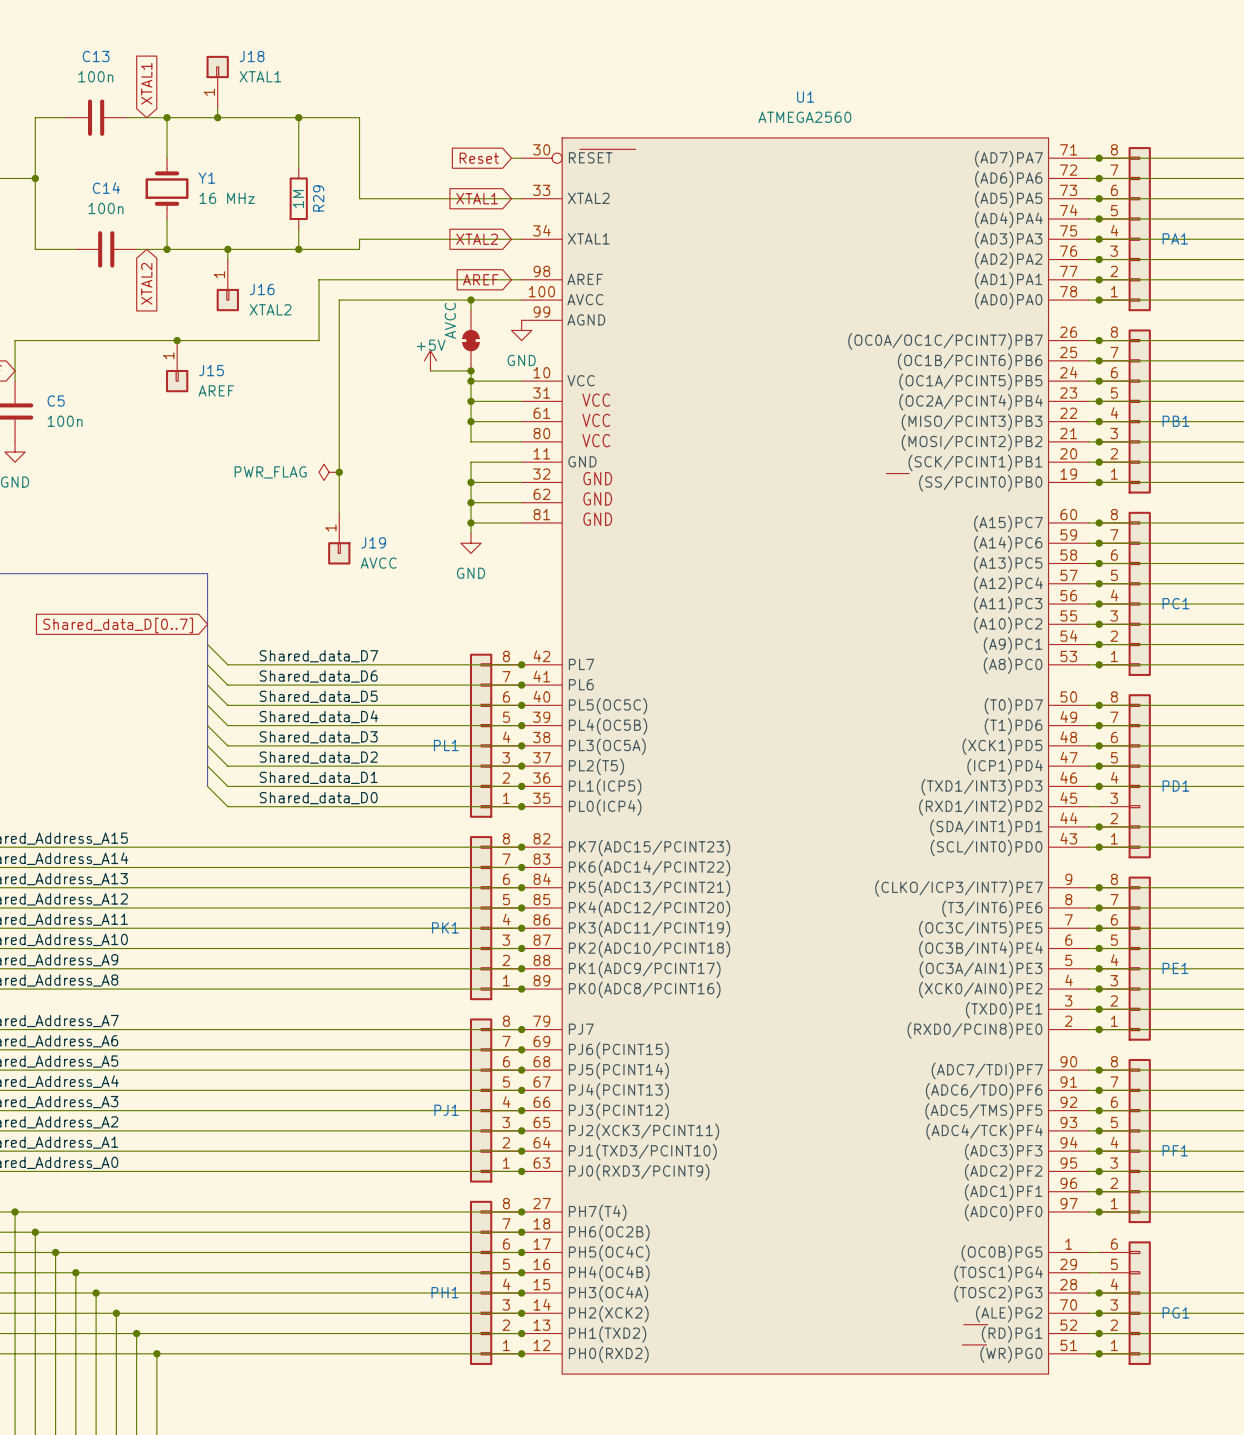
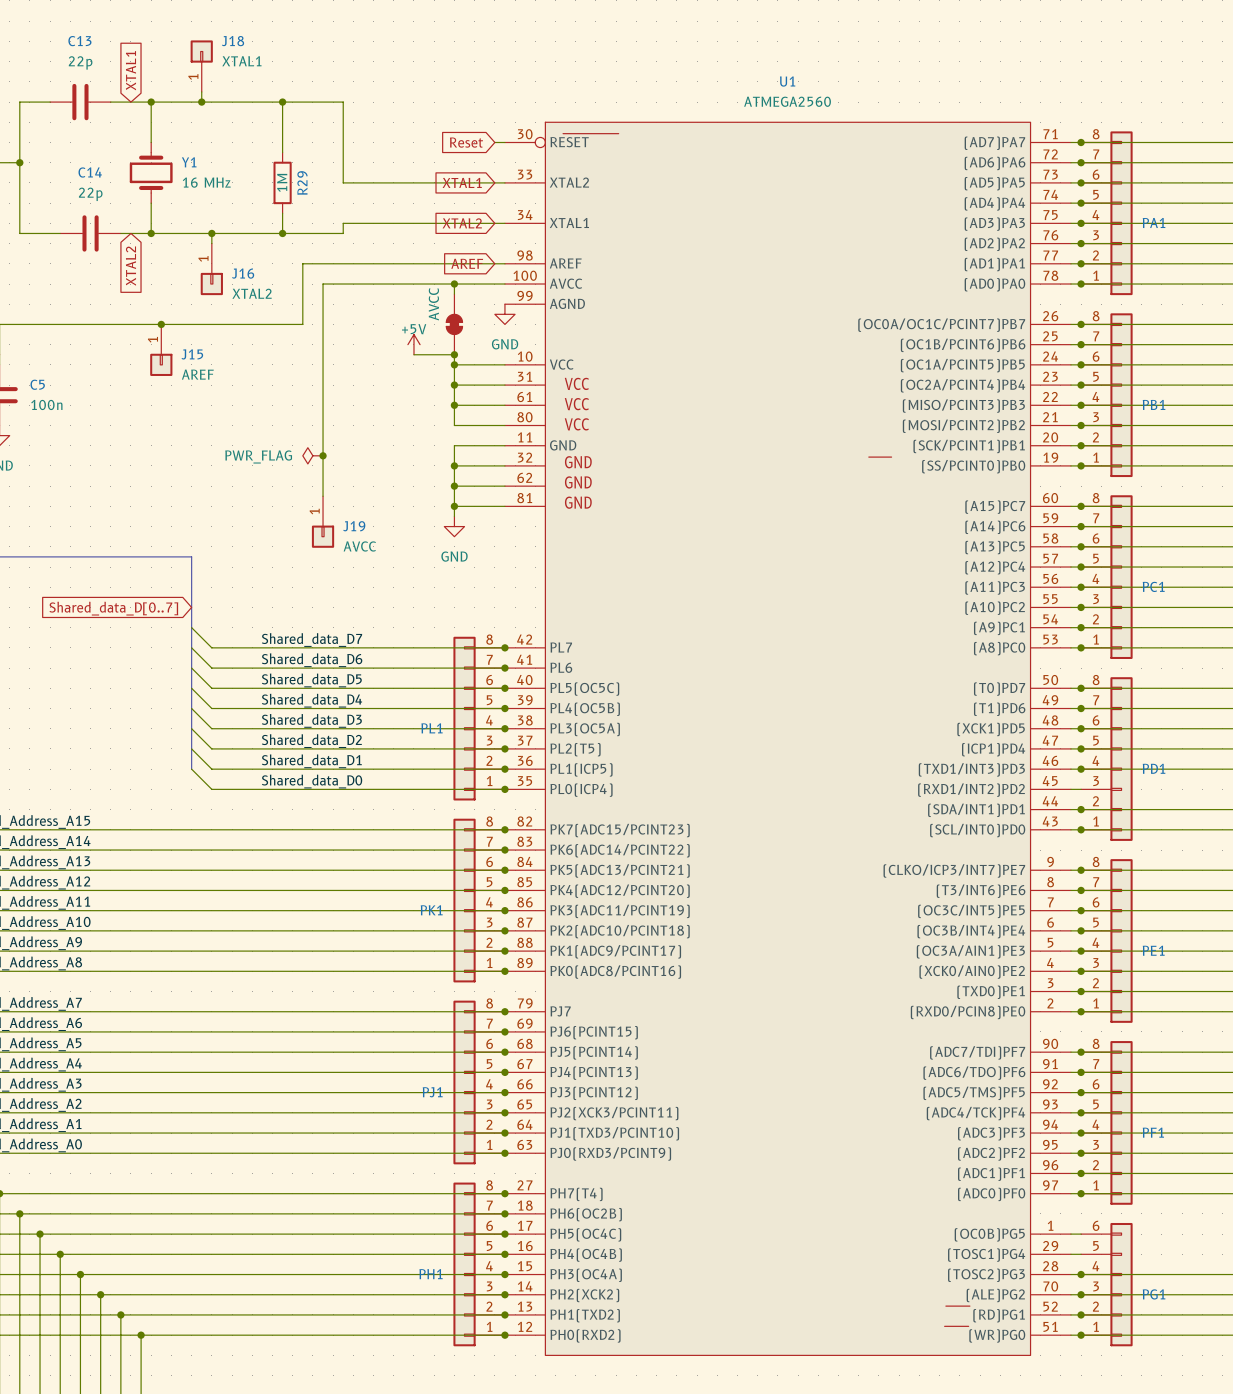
C13 value: 100n (95, 76) -> 22p (80, 62)
C14 value: 100n (105, 208) -> 22p (90, 194)

